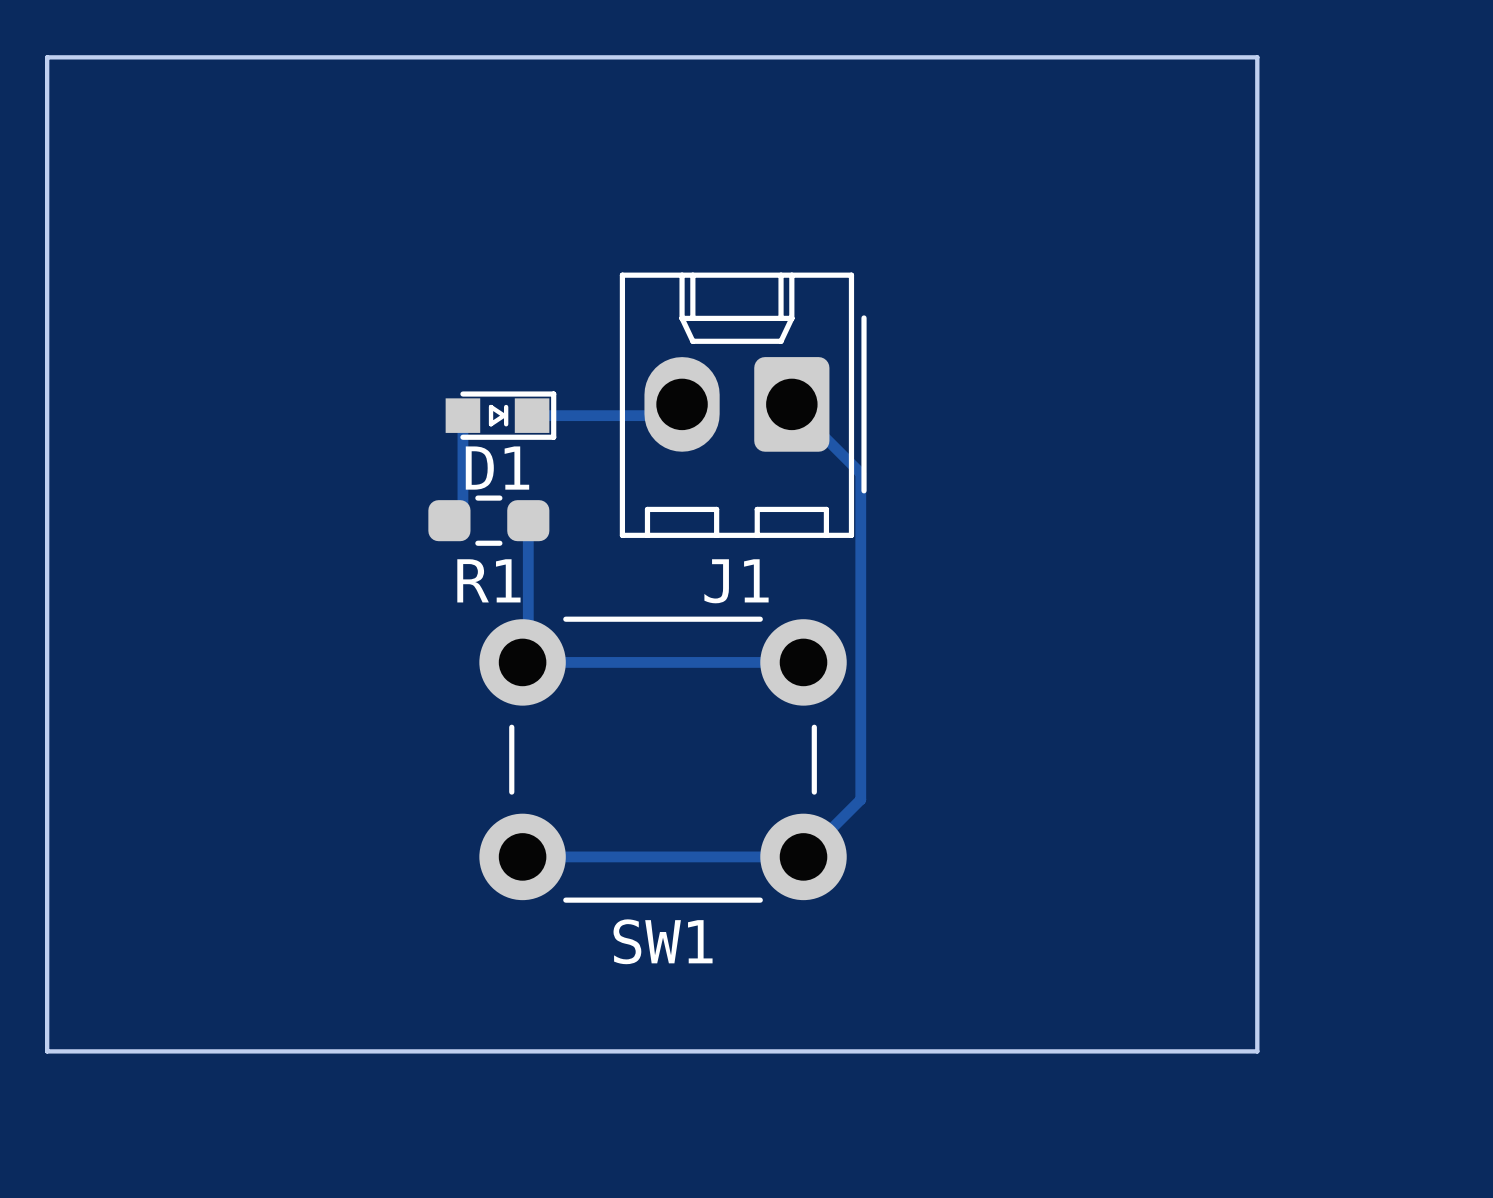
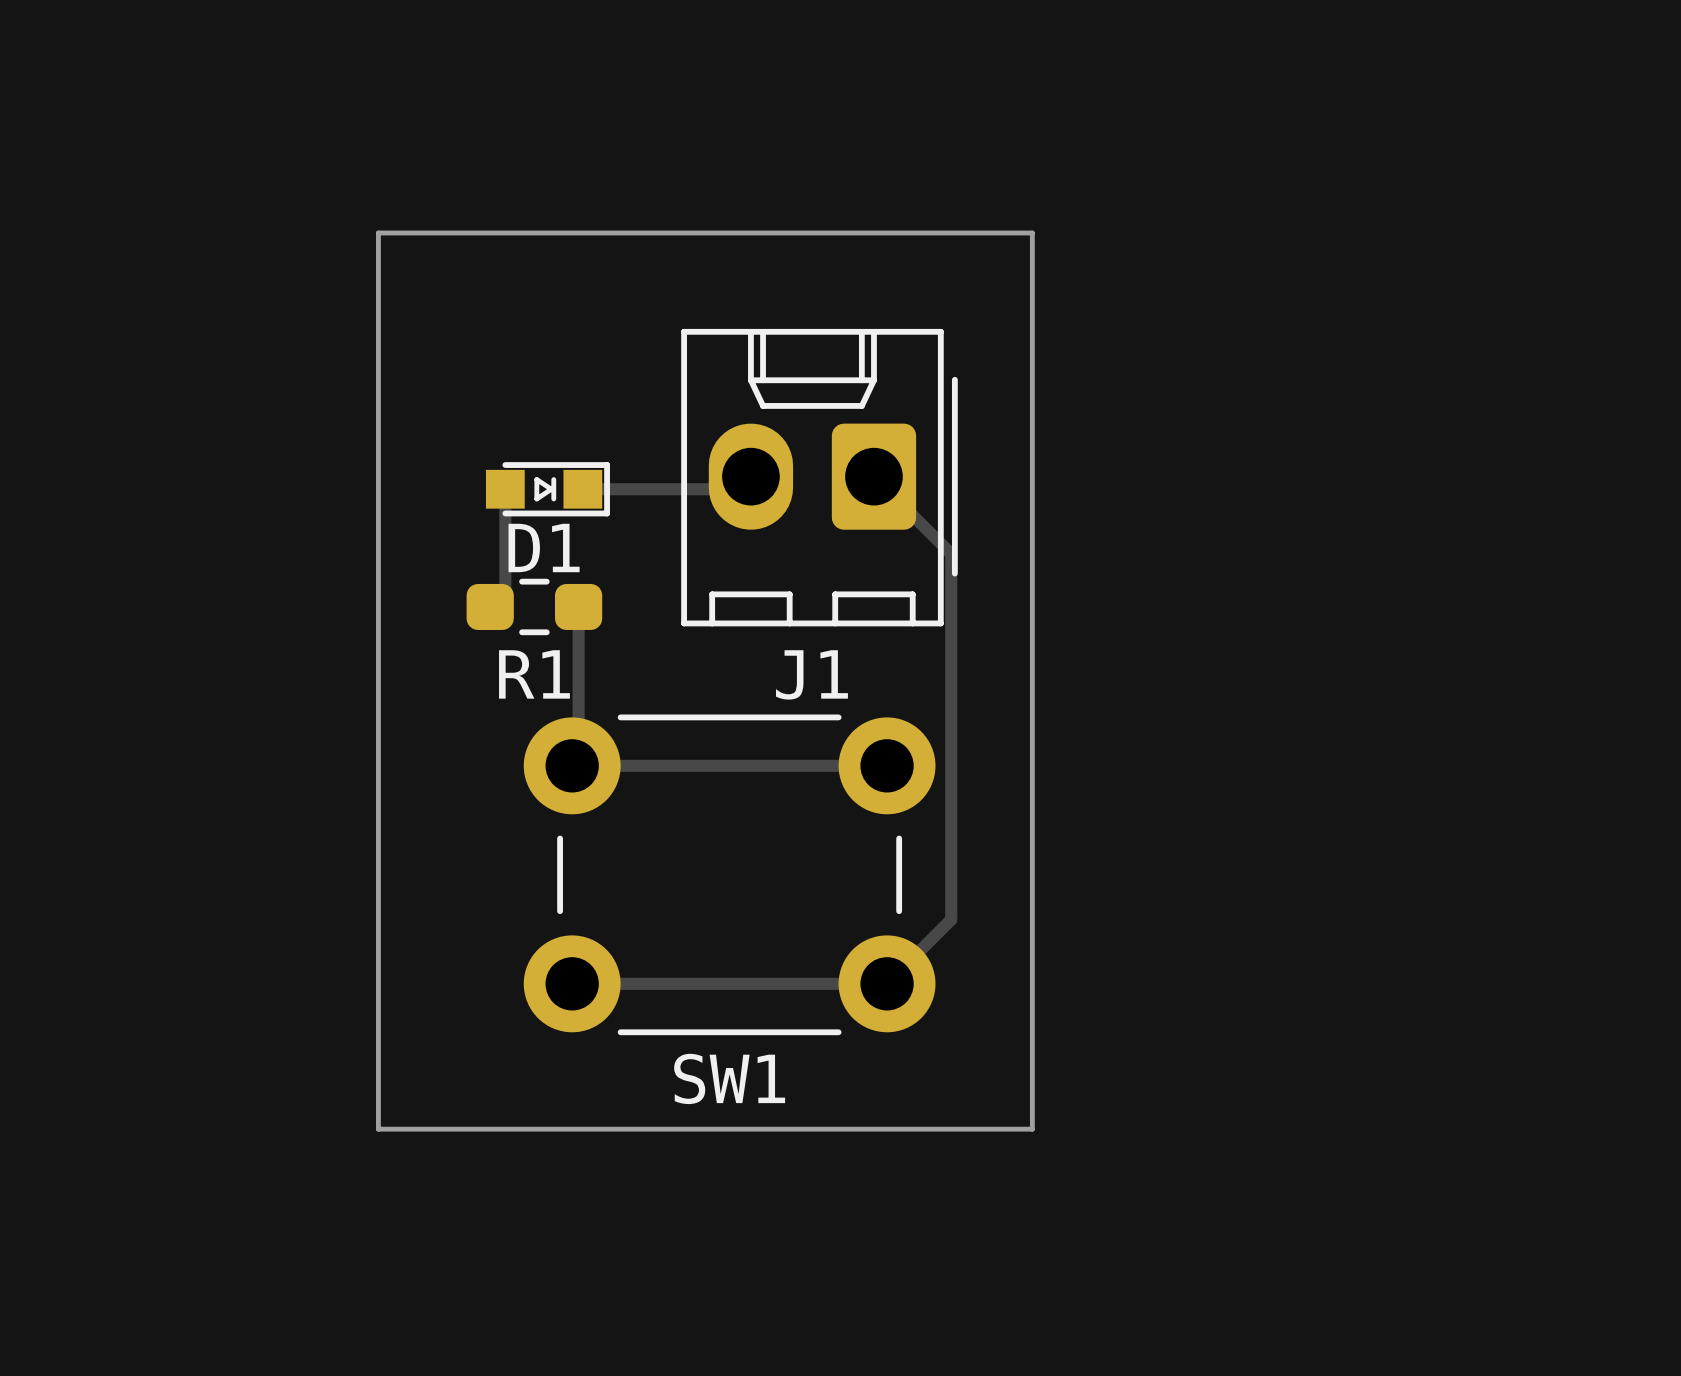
board edge: (47, 57) (1257, 57) (1257, 1051) (47, 1051) (47, 57) -> none
board edge: none -> (378, 233) (1032, 233) (1032, 1129) (378, 1129) (378, 233)

